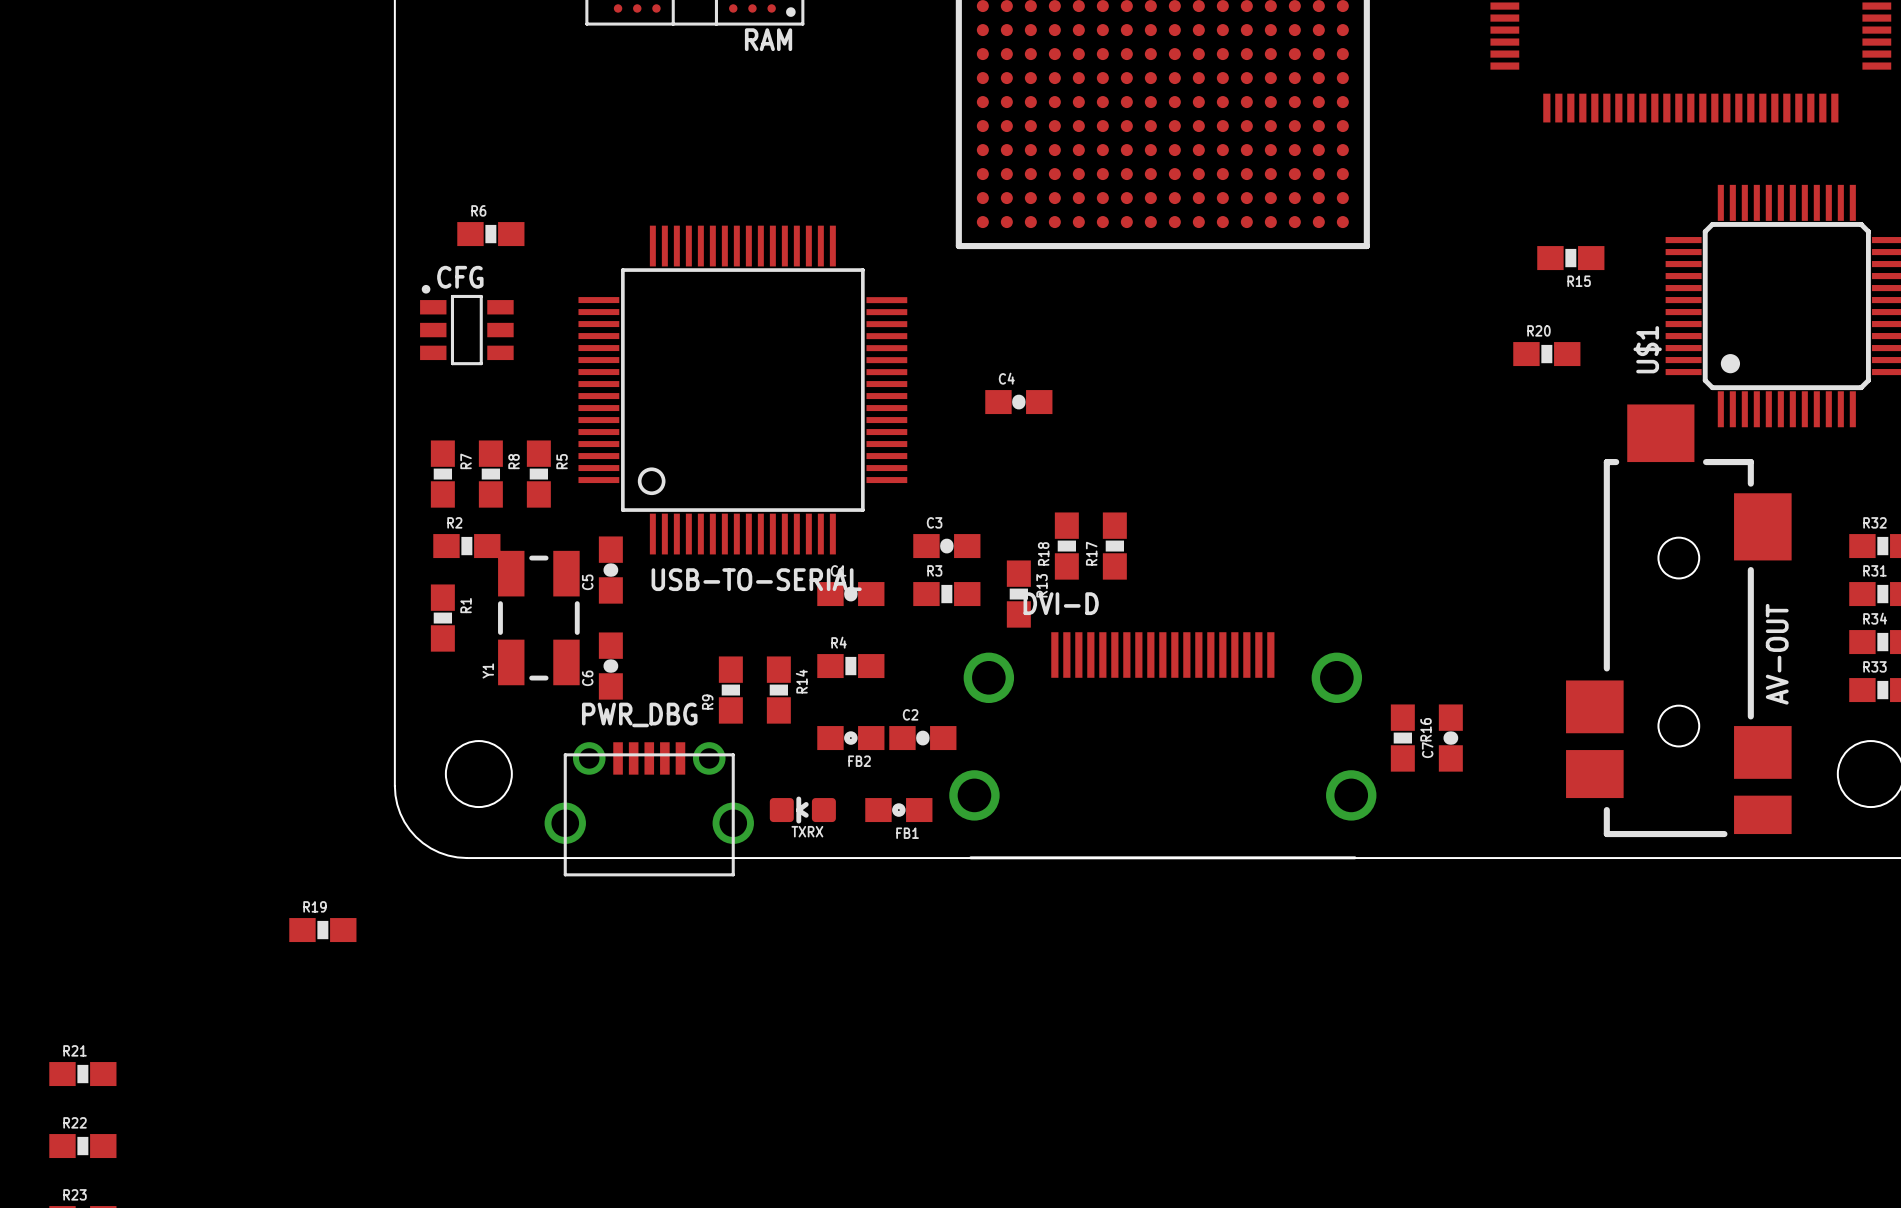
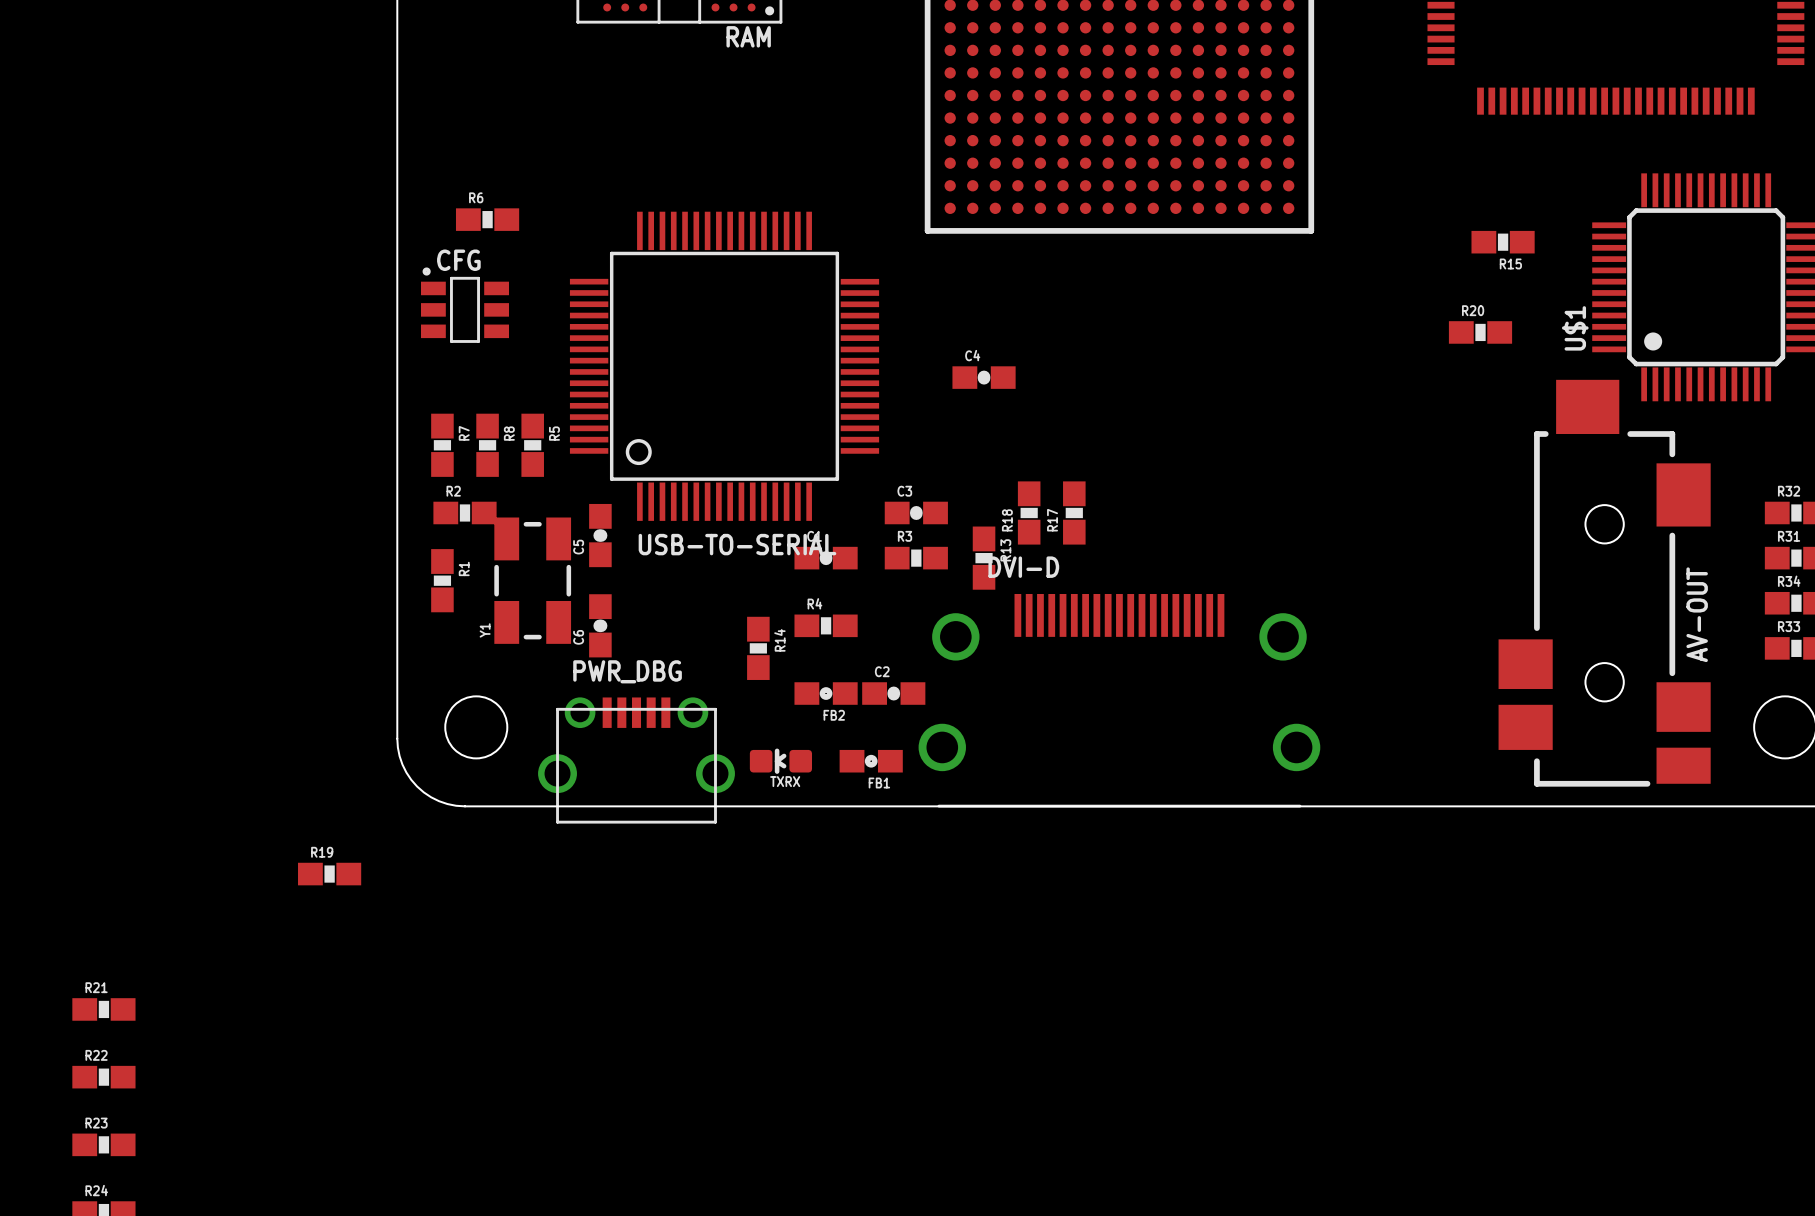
R9: (730, 690) -> none
R16: (1402, 738) -> none
C7: (1450, 738) -> none

